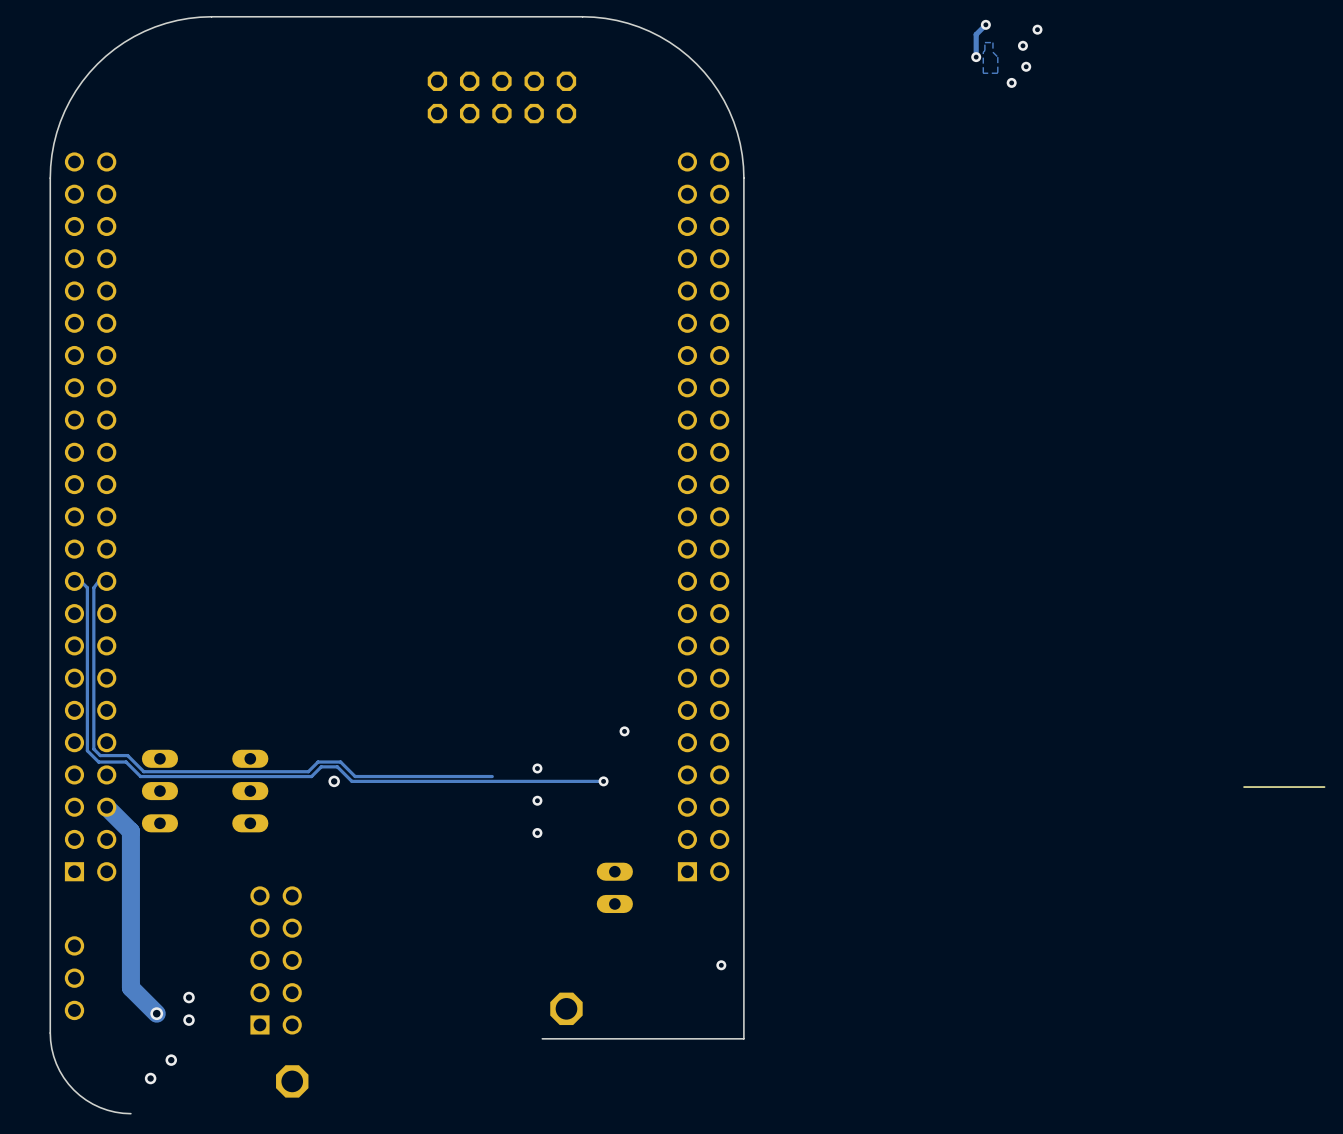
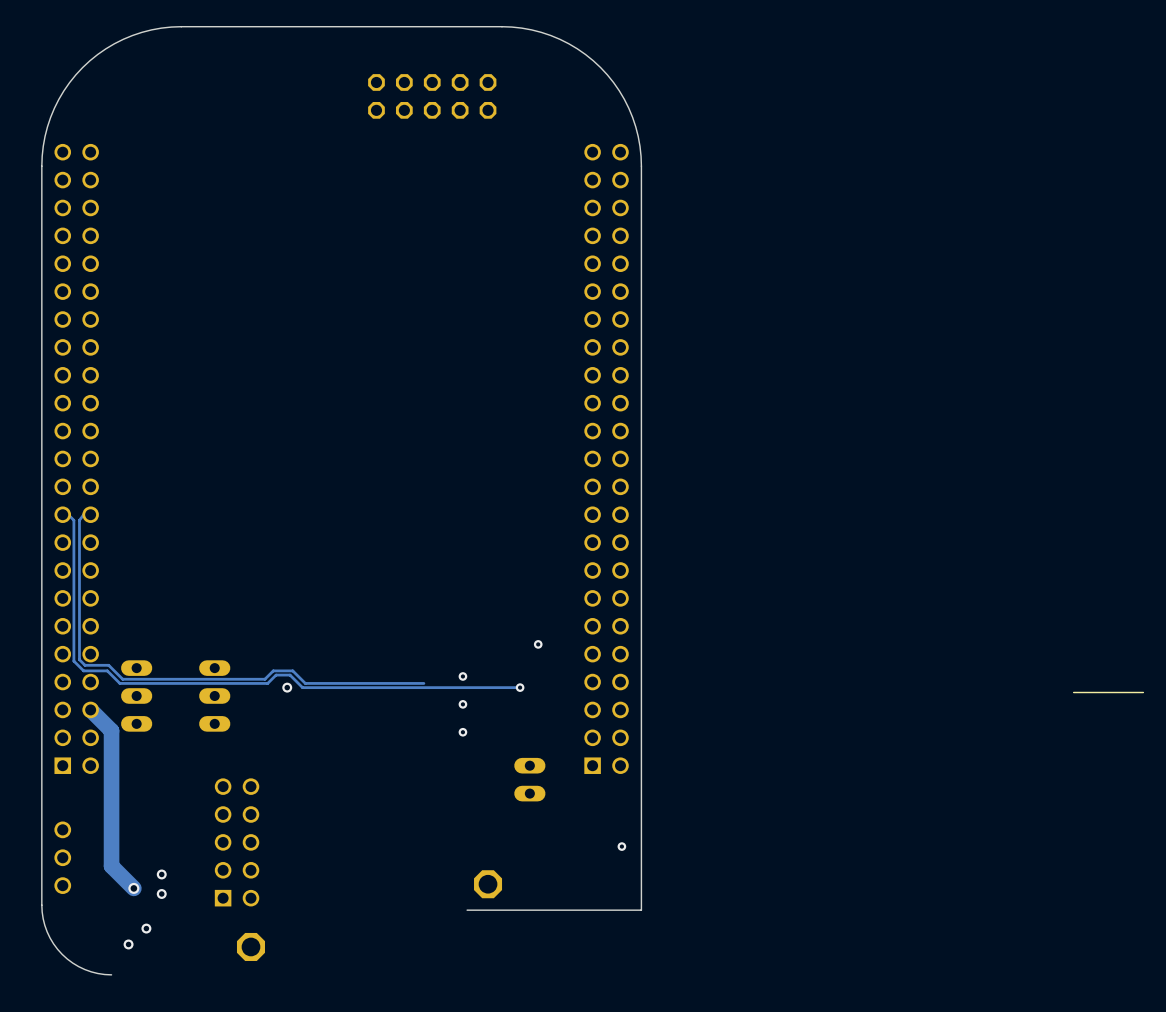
track: (985, 24) (976, 34) (976, 57) -> none
via: (985, 24) -> none
via: (1037, 29) -> none
zone outline: (992, 42) (984, 42) (983, 73) (997, 73) (997, 57) (992, 52) (992, 42) -> none
via: (1022, 45) -> none
via: (976, 57) -> none
via: (1026, 66) -> none
via: (1011, 82) -> none

